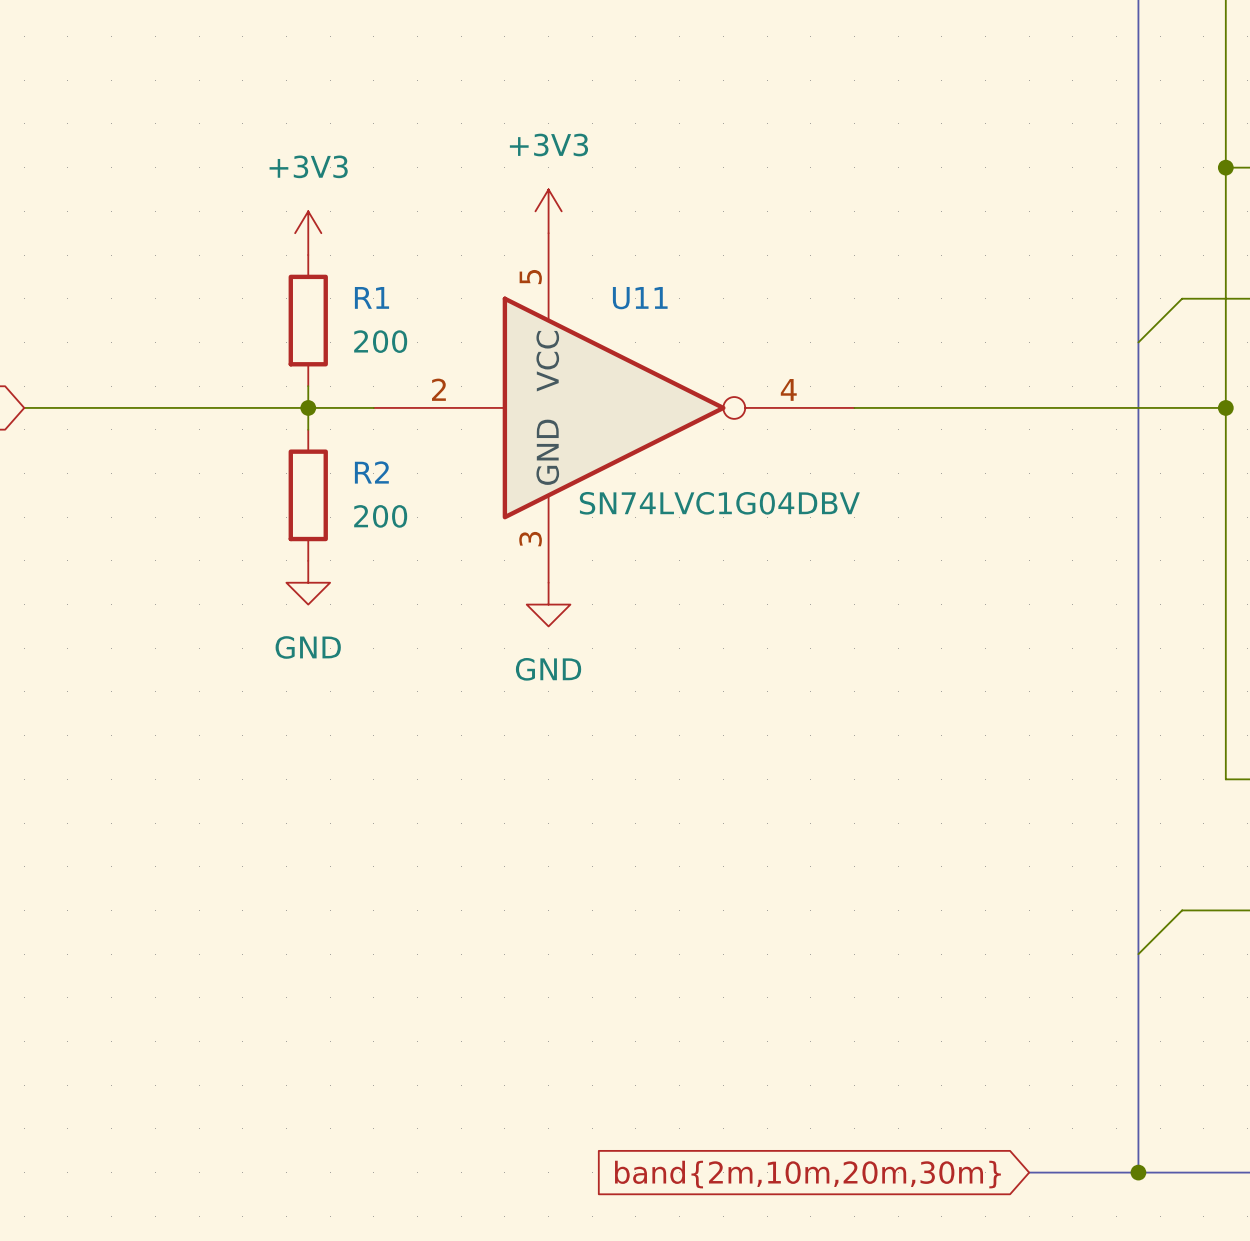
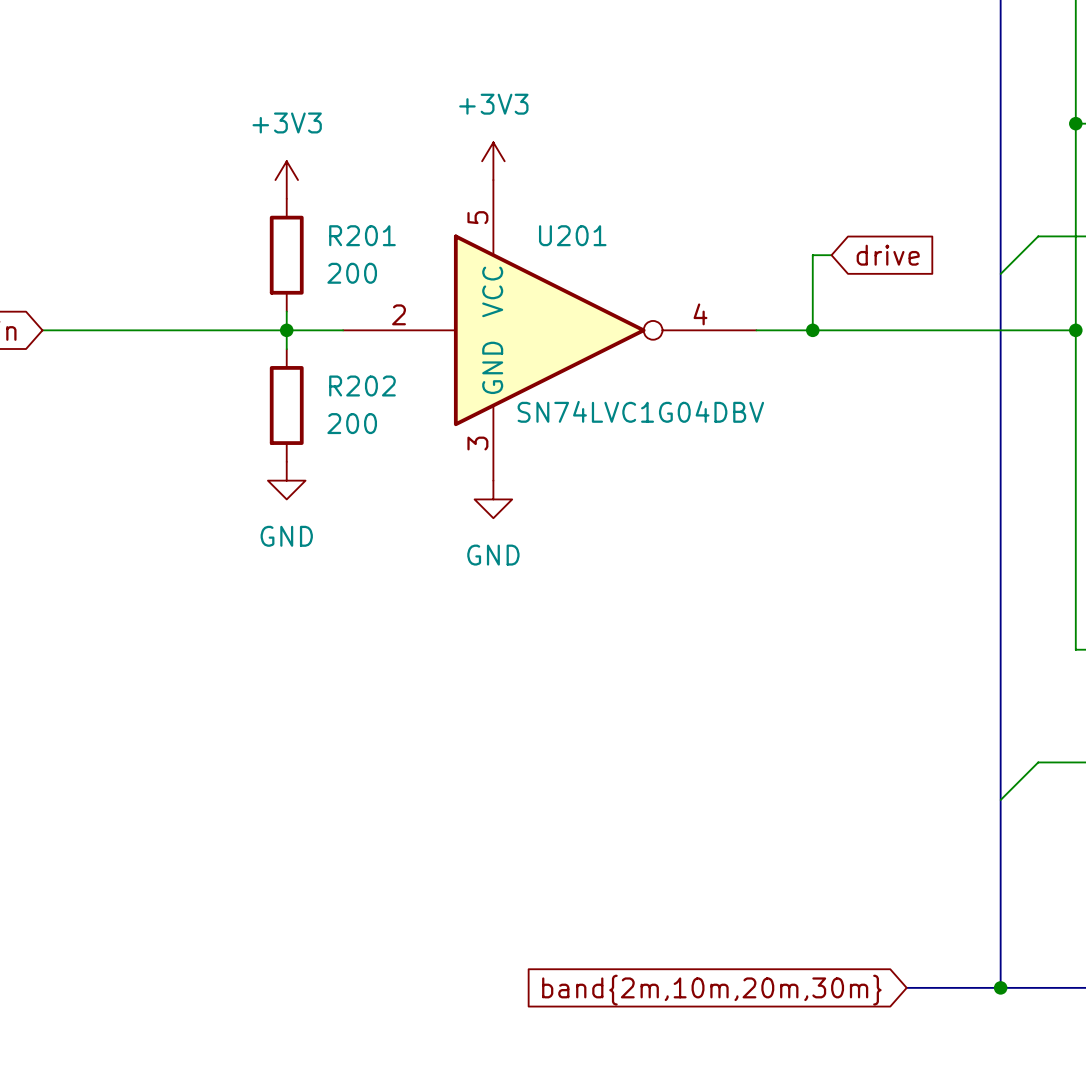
R1 name: R1 (371, 297) -> R201 (362, 235)
U11 name: U11 (640, 298) -> U201 (572, 235)
wire: none -> (831, 255) (812, 255) (812, 330)
global label: none -> drive (888, 255)
junction: none -> (812, 330)
R2 name: R2 (371, 472) -> R202 (362, 386)

